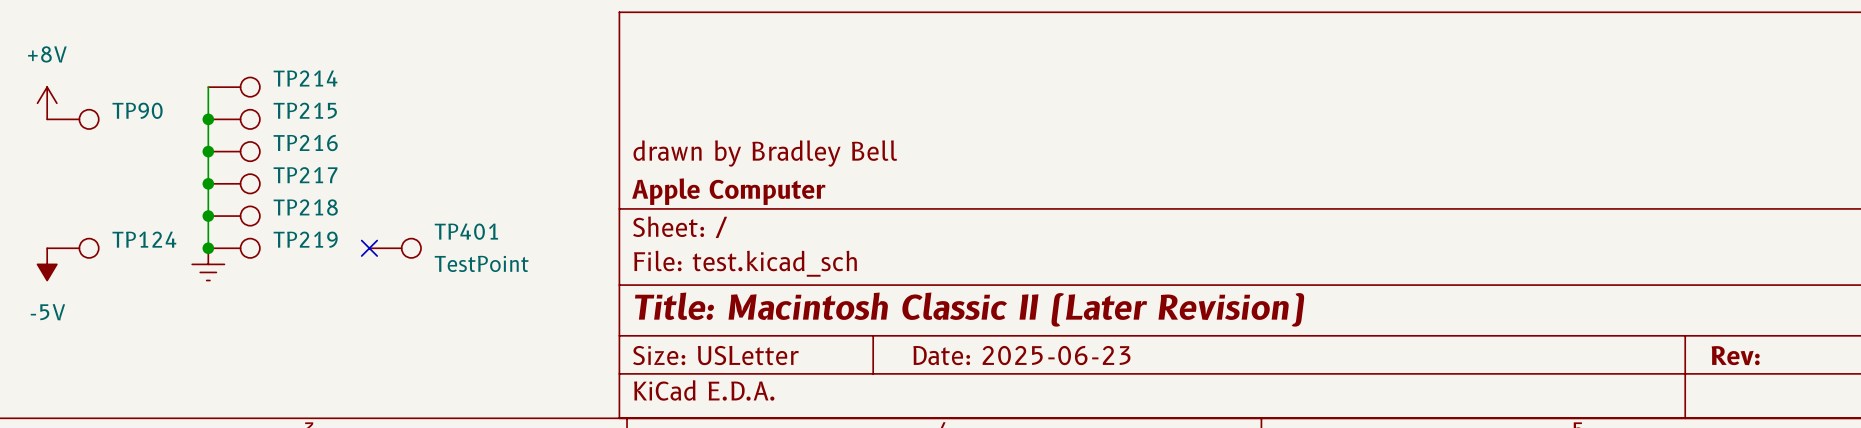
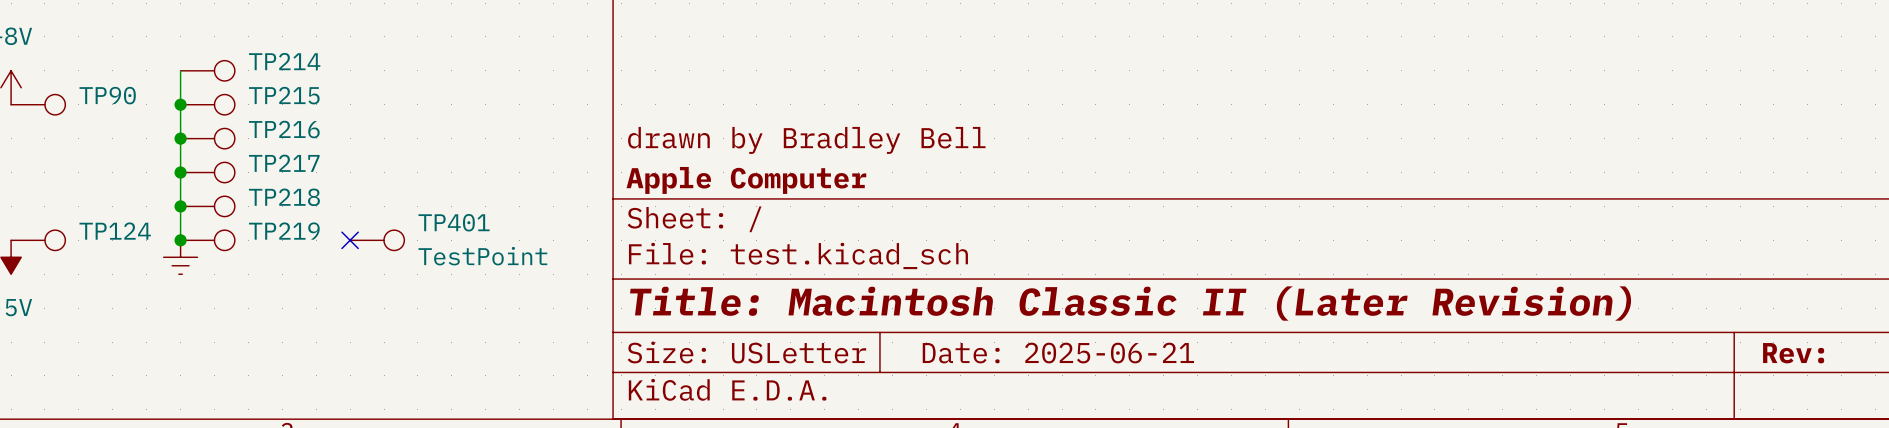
title block: Date: 2025-06-23 (1021, 355) -> Date: 2025-06-21 (1058, 353)

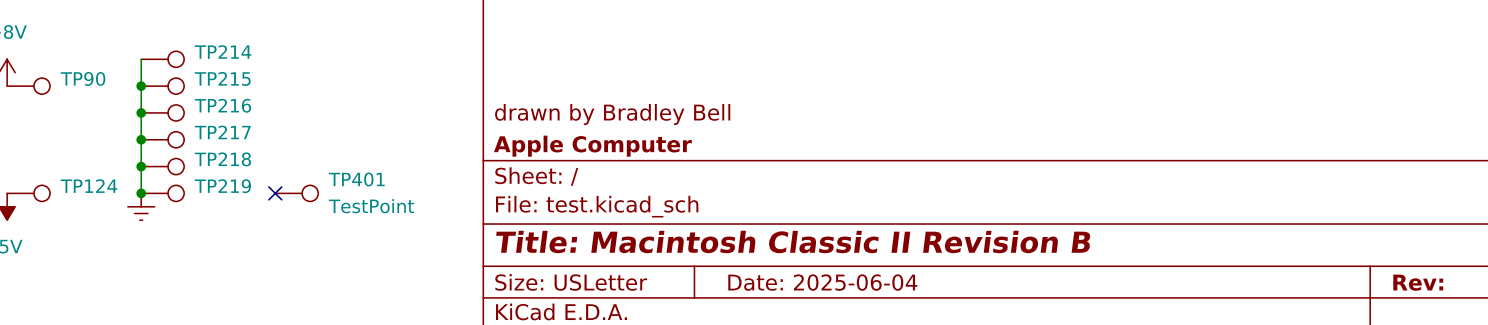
title block: Title: Macintosh Classic II (Later Revision) (1130, 303) -> Title: Macintosh Classic II Revision B (793, 241)
title block: Date: 2025-06-21 (1058, 353) -> Date: 2025-06-04 (822, 282)

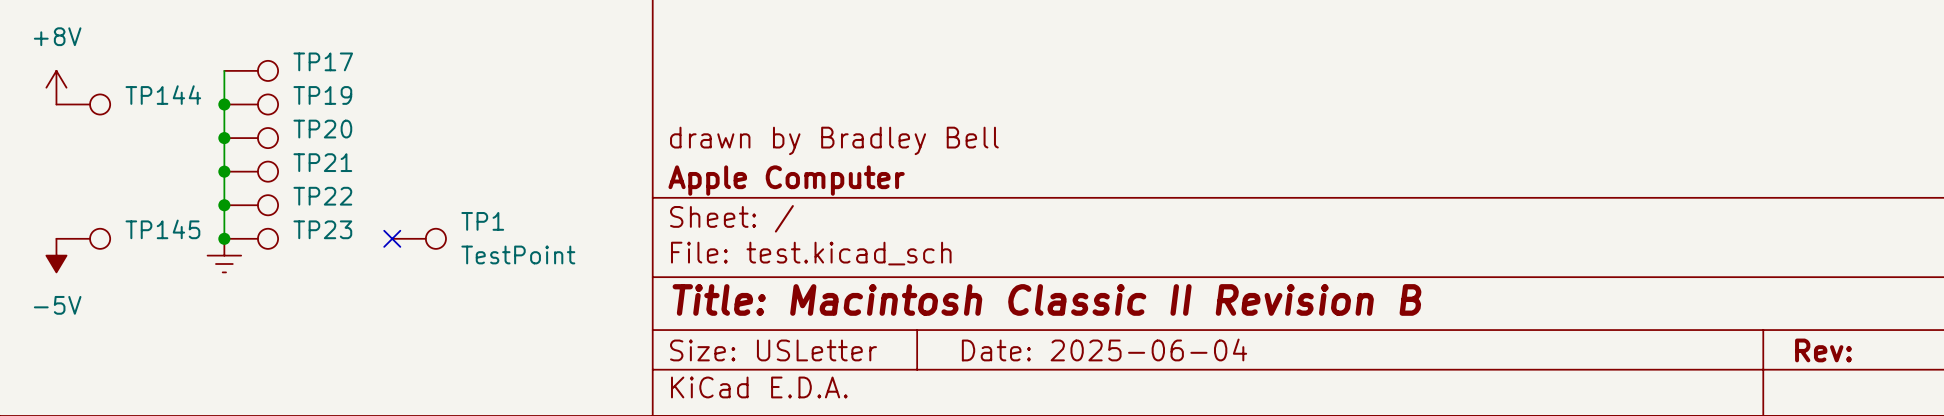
TP214 name: TP214 (223, 51) -> TP17 (323, 61)
TP90 name: TP90 (83, 78) -> TP144 (163, 95)
TP215 name: TP215 (222, 78) -> TP19 (322, 95)
TP216 name: TP216 (222, 105) -> TP20 (322, 129)
TP217 name: TP217 (222, 132) -> TP21 (322, 162)
TP218 name: TP218 (222, 159) -> TP22 (322, 196)
TP401 name: TP401 (356, 179) -> TP1 (482, 221)
TP124 name: TP124 (88, 186) -> TP145 (162, 229)
TP219 name: TP219 (222, 186) -> TP23 (322, 229)

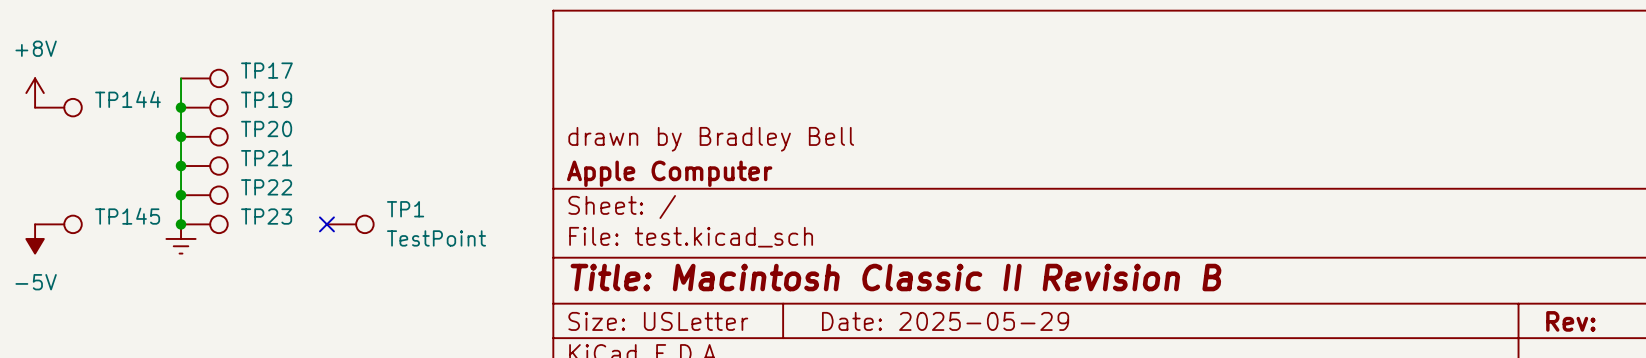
title block: Date: 2025-06-04 (1104, 349) -> Date: 2025-05-29 (945, 321)

